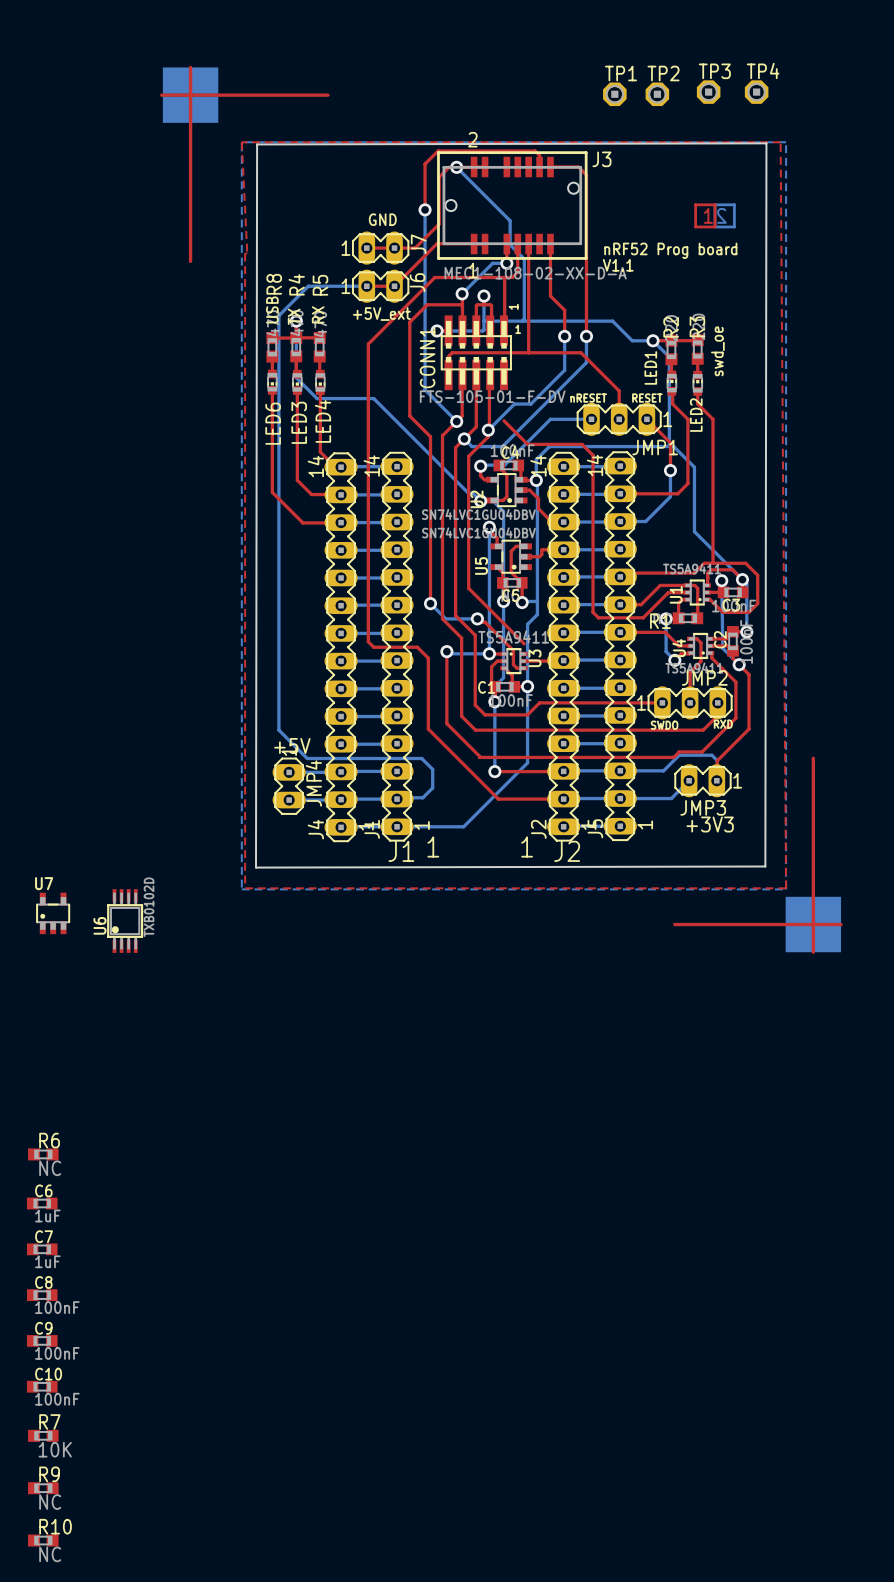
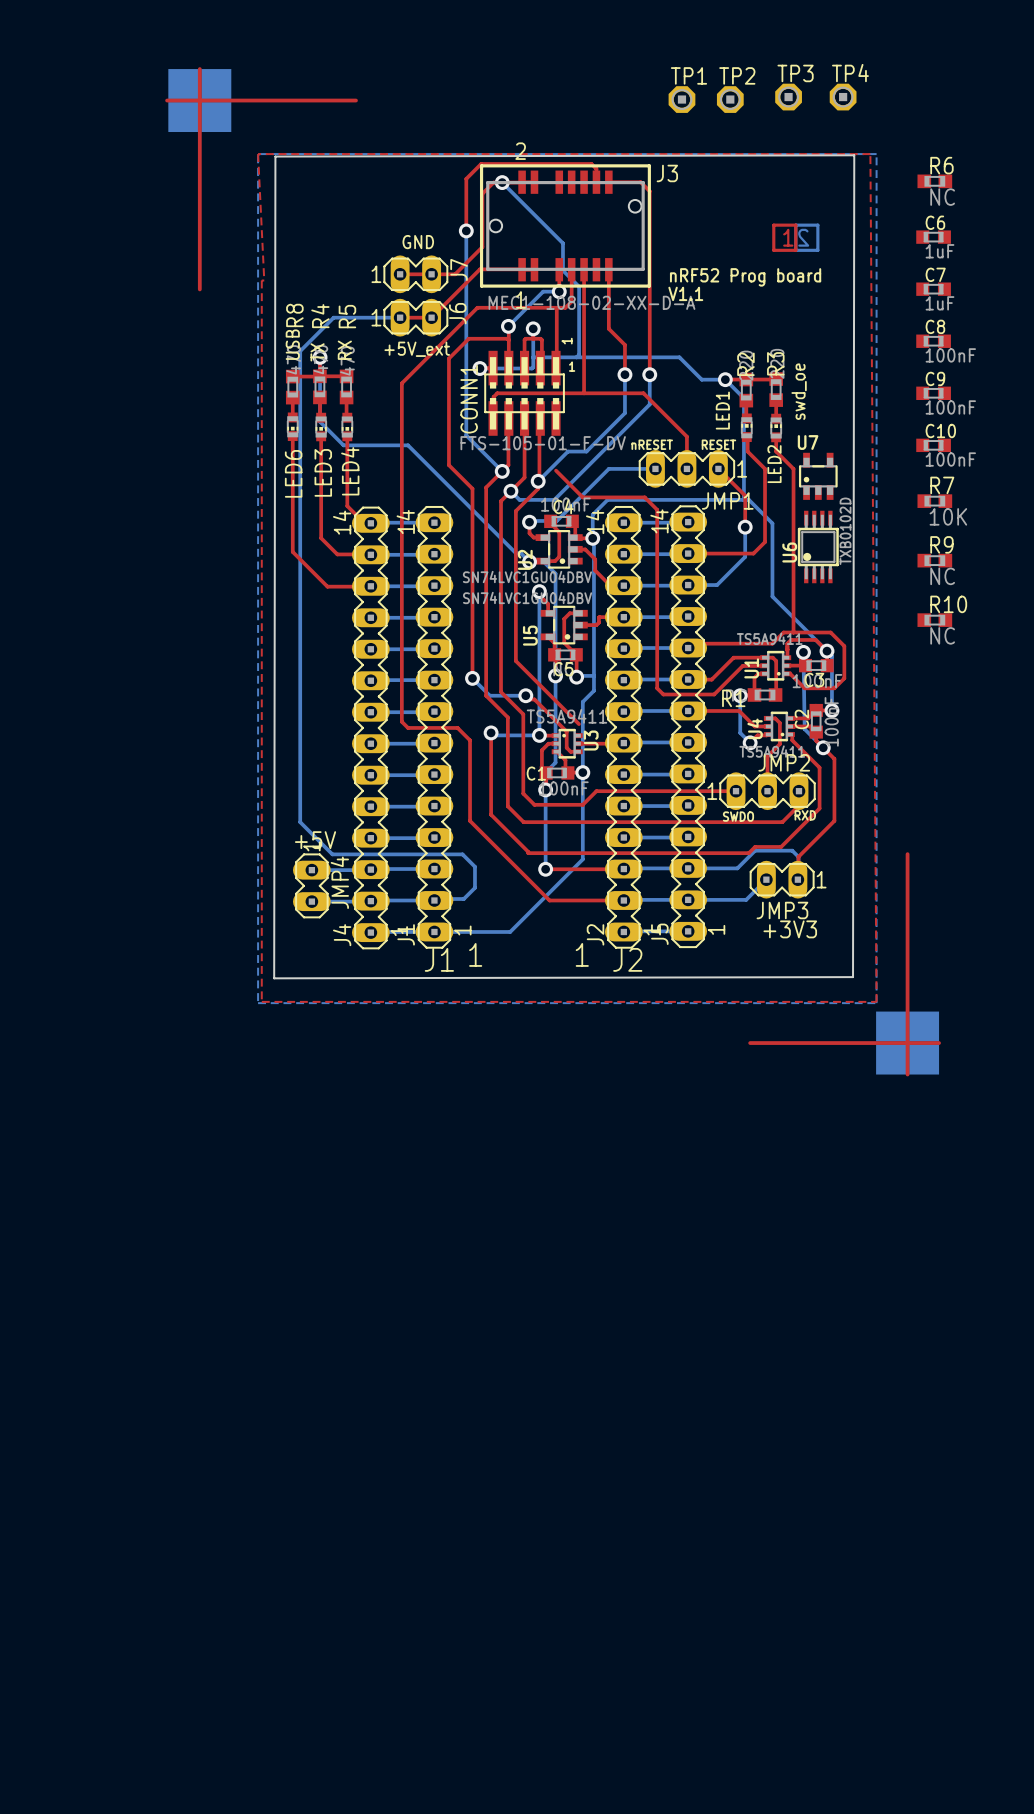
U7 position: (53, 913) -> (818, 476)
U6 position: (125, 921) -> (818, 546)
R6 position: (43, 1154) -> (934, 181)
C6 position: (42, 1203) -> (933, 237)
C7 position: (42, 1249) -> (933, 289)
C8 position: (42, 1295) -> (933, 341)
C9 position: (42, 1340) -> (933, 393)
C10 position: (42, 1386) -> (933, 445)
R7 position: (43, 1435) -> (934, 501)
R9 position: (43, 1488) -> (934, 560)
R10 position: (43, 1540) -> (934, 620)

